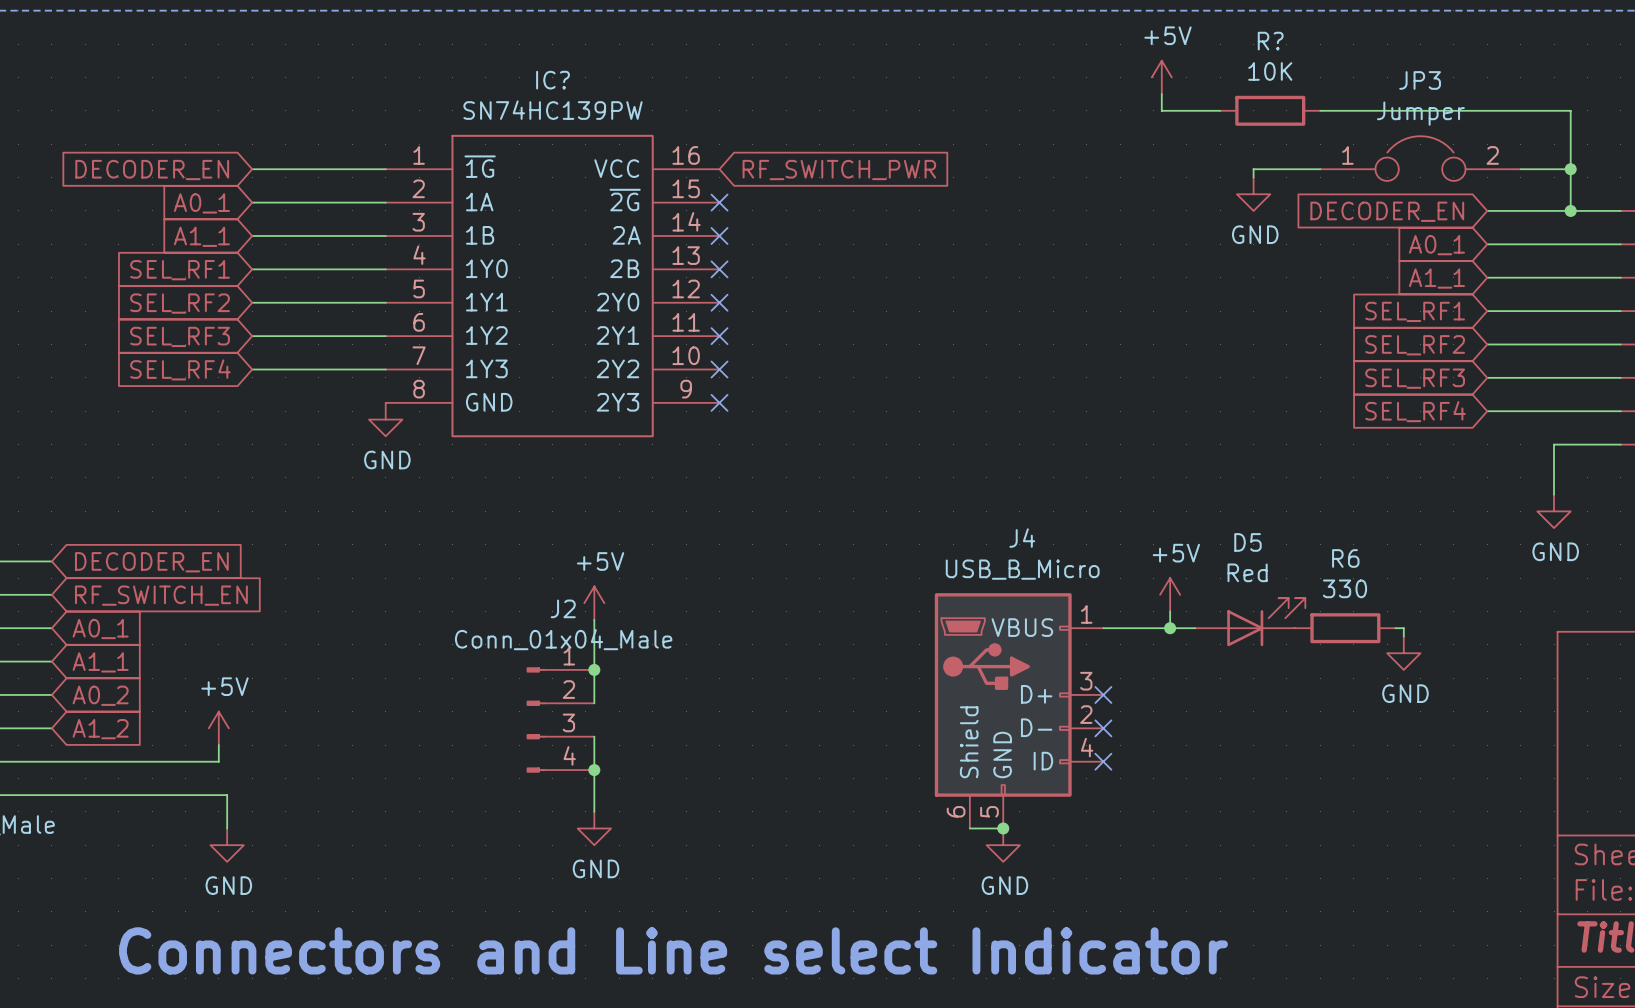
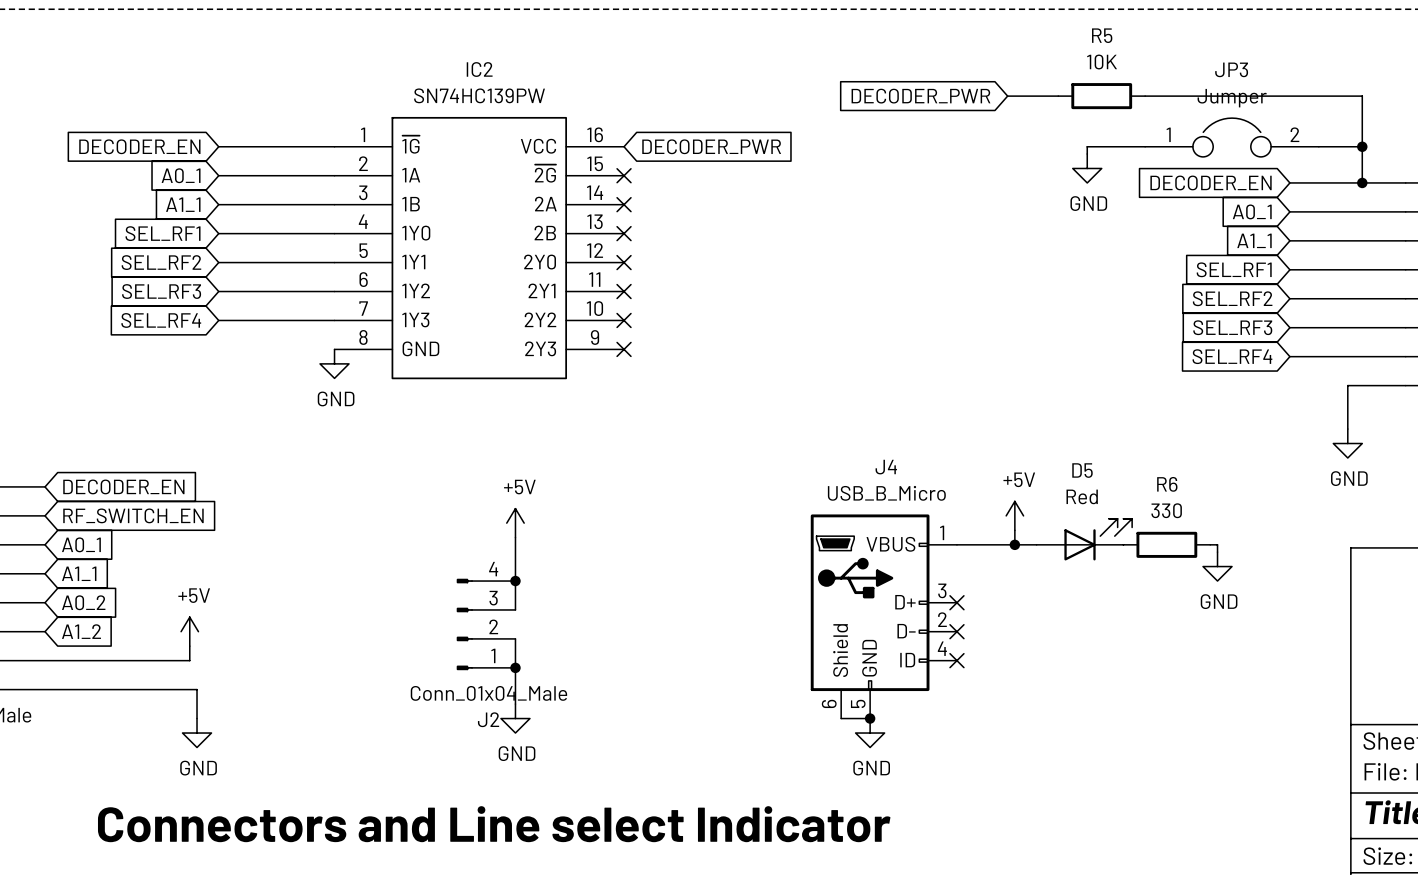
R? name: R? (1270, 41) -> R5 (1102, 35)
power symbol: +5V (1161, 77) -> none
IC? name: IC? (553, 80) -> IC2 (479, 69)
wire: (1161, 94) (1161, 110) -> none
global label: none -> DECODER_PWR (920, 96)
global label: RF_SWITCH_PWR (839, 170) -> DECODER_PWR (711, 146)
J2 flip: as is (535, 720) -> up-down (464, 624)

